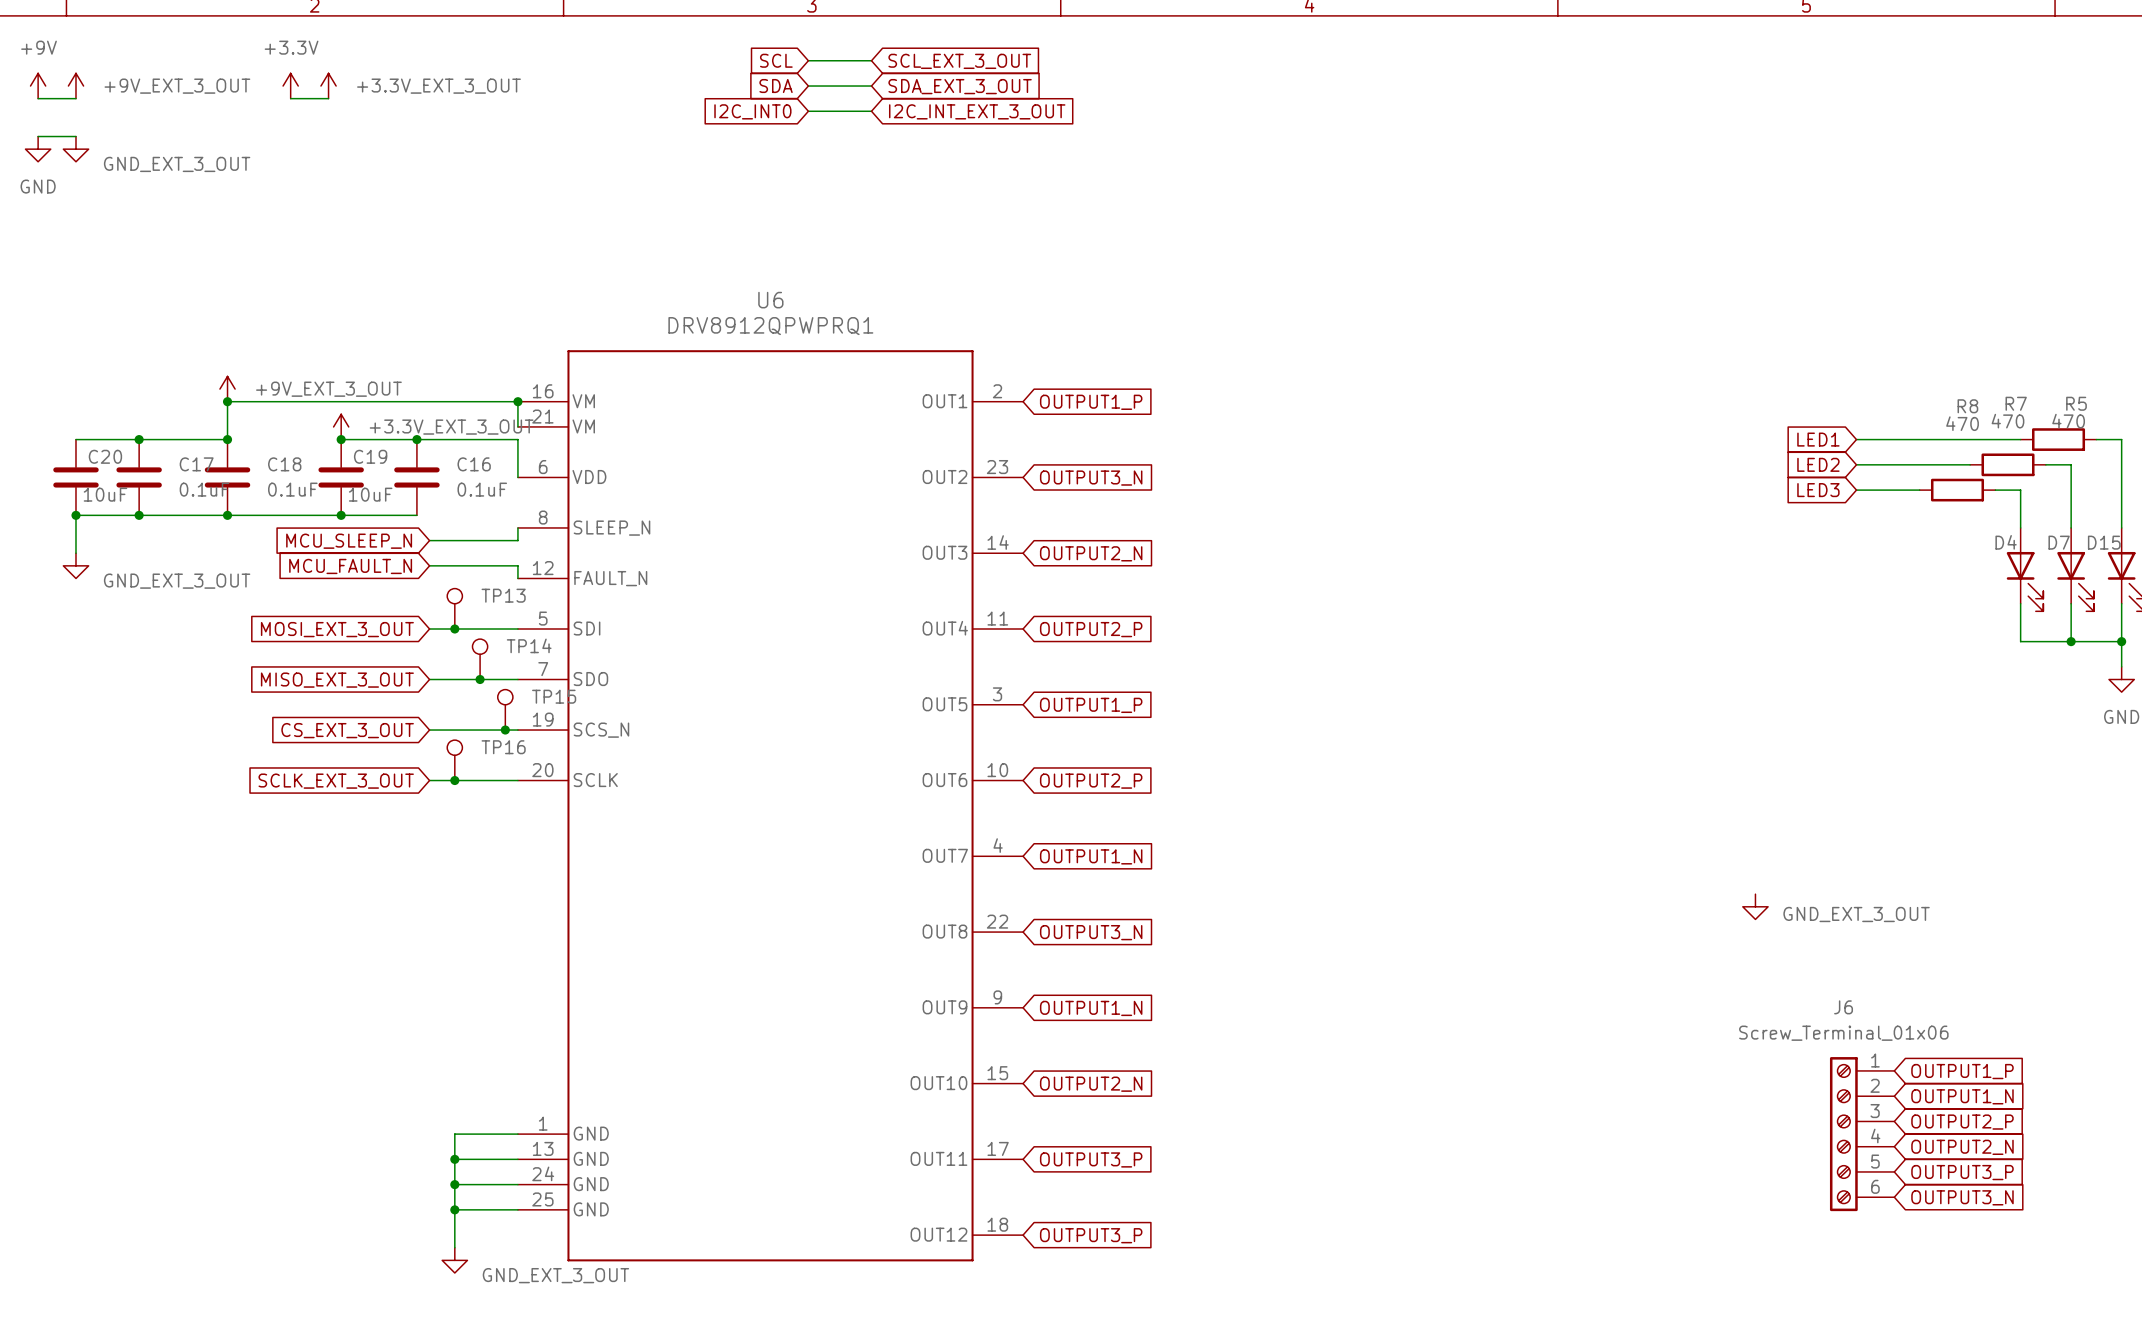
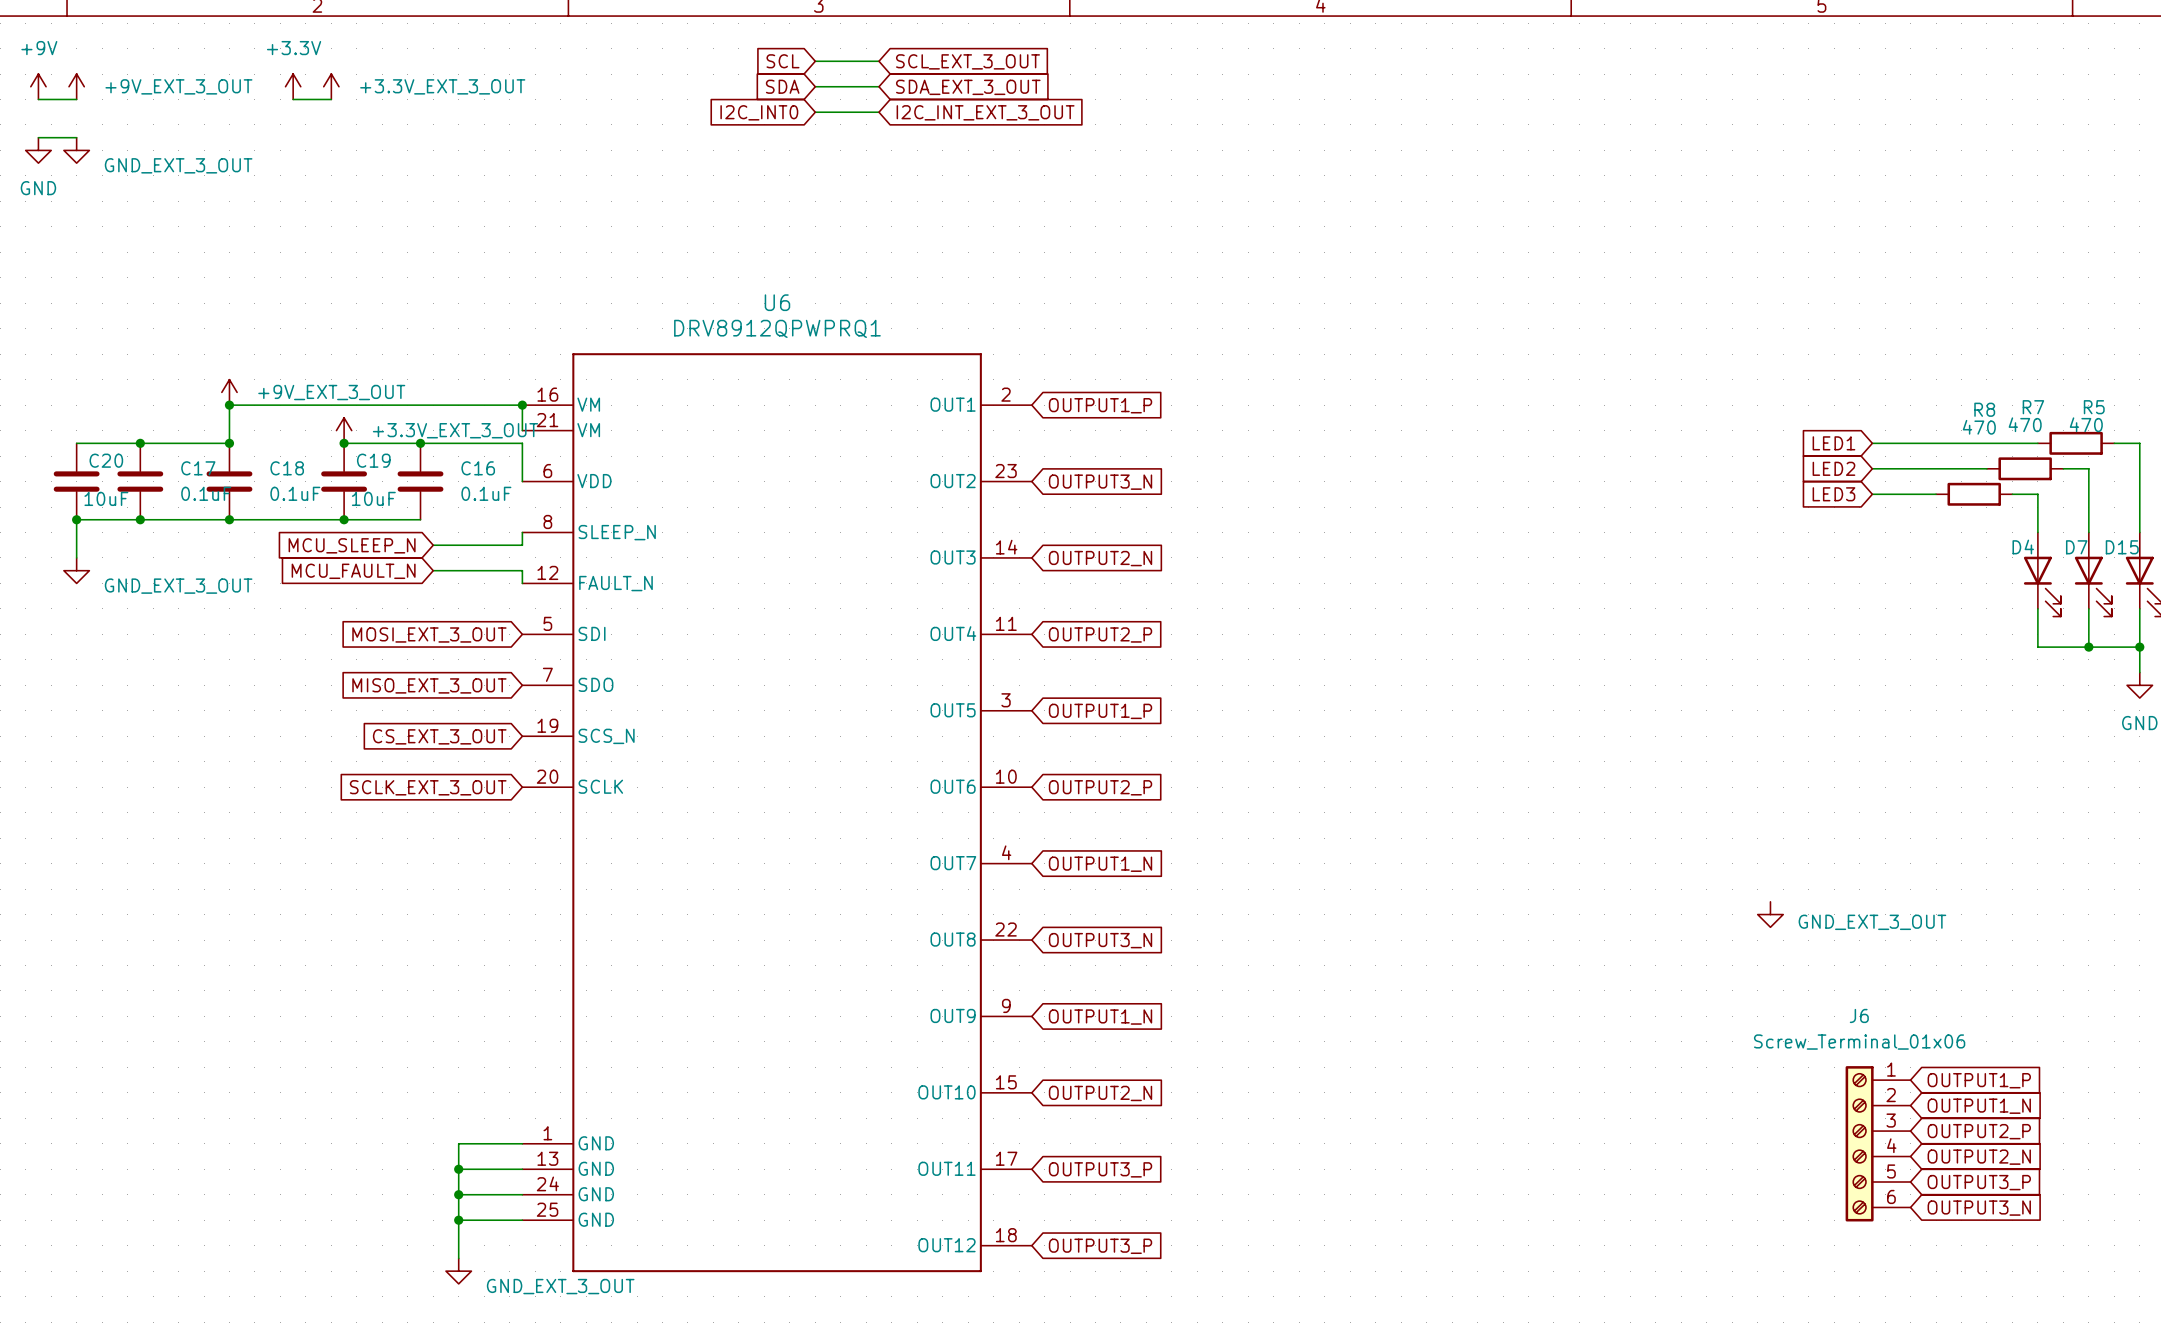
TP13: (454, 608) -> none
wire: (429, 628) (517, 628) -> none
junction: (454, 628) -> none
global label position: MOSI_EXT_3_OUT (337, 629) -> MOSI_EXT_3_OUT (429, 634)
TP14: (480, 659) -> none
wire: (429, 679) (517, 679) -> none
junction: (480, 679) -> none
global label position: MISO_EXT_3_OUT (337, 680) -> MISO_EXT_3_OUT (429, 685)
TP15: (505, 709) -> none
global label position: CS_EXT_3_OUT (347, 730) -> CS_EXT_3_OUT (439, 736)
wire: (429, 730) (517, 730) -> none
junction: (505, 730) -> none
TP16: (454, 760) -> none
wire: (429, 780) (517, 780) -> none
junction: (454, 780) -> none
global label position: SCLK_EXT_3_OUT (336, 781) -> SCLK_EXT_3_OUT (428, 787)

